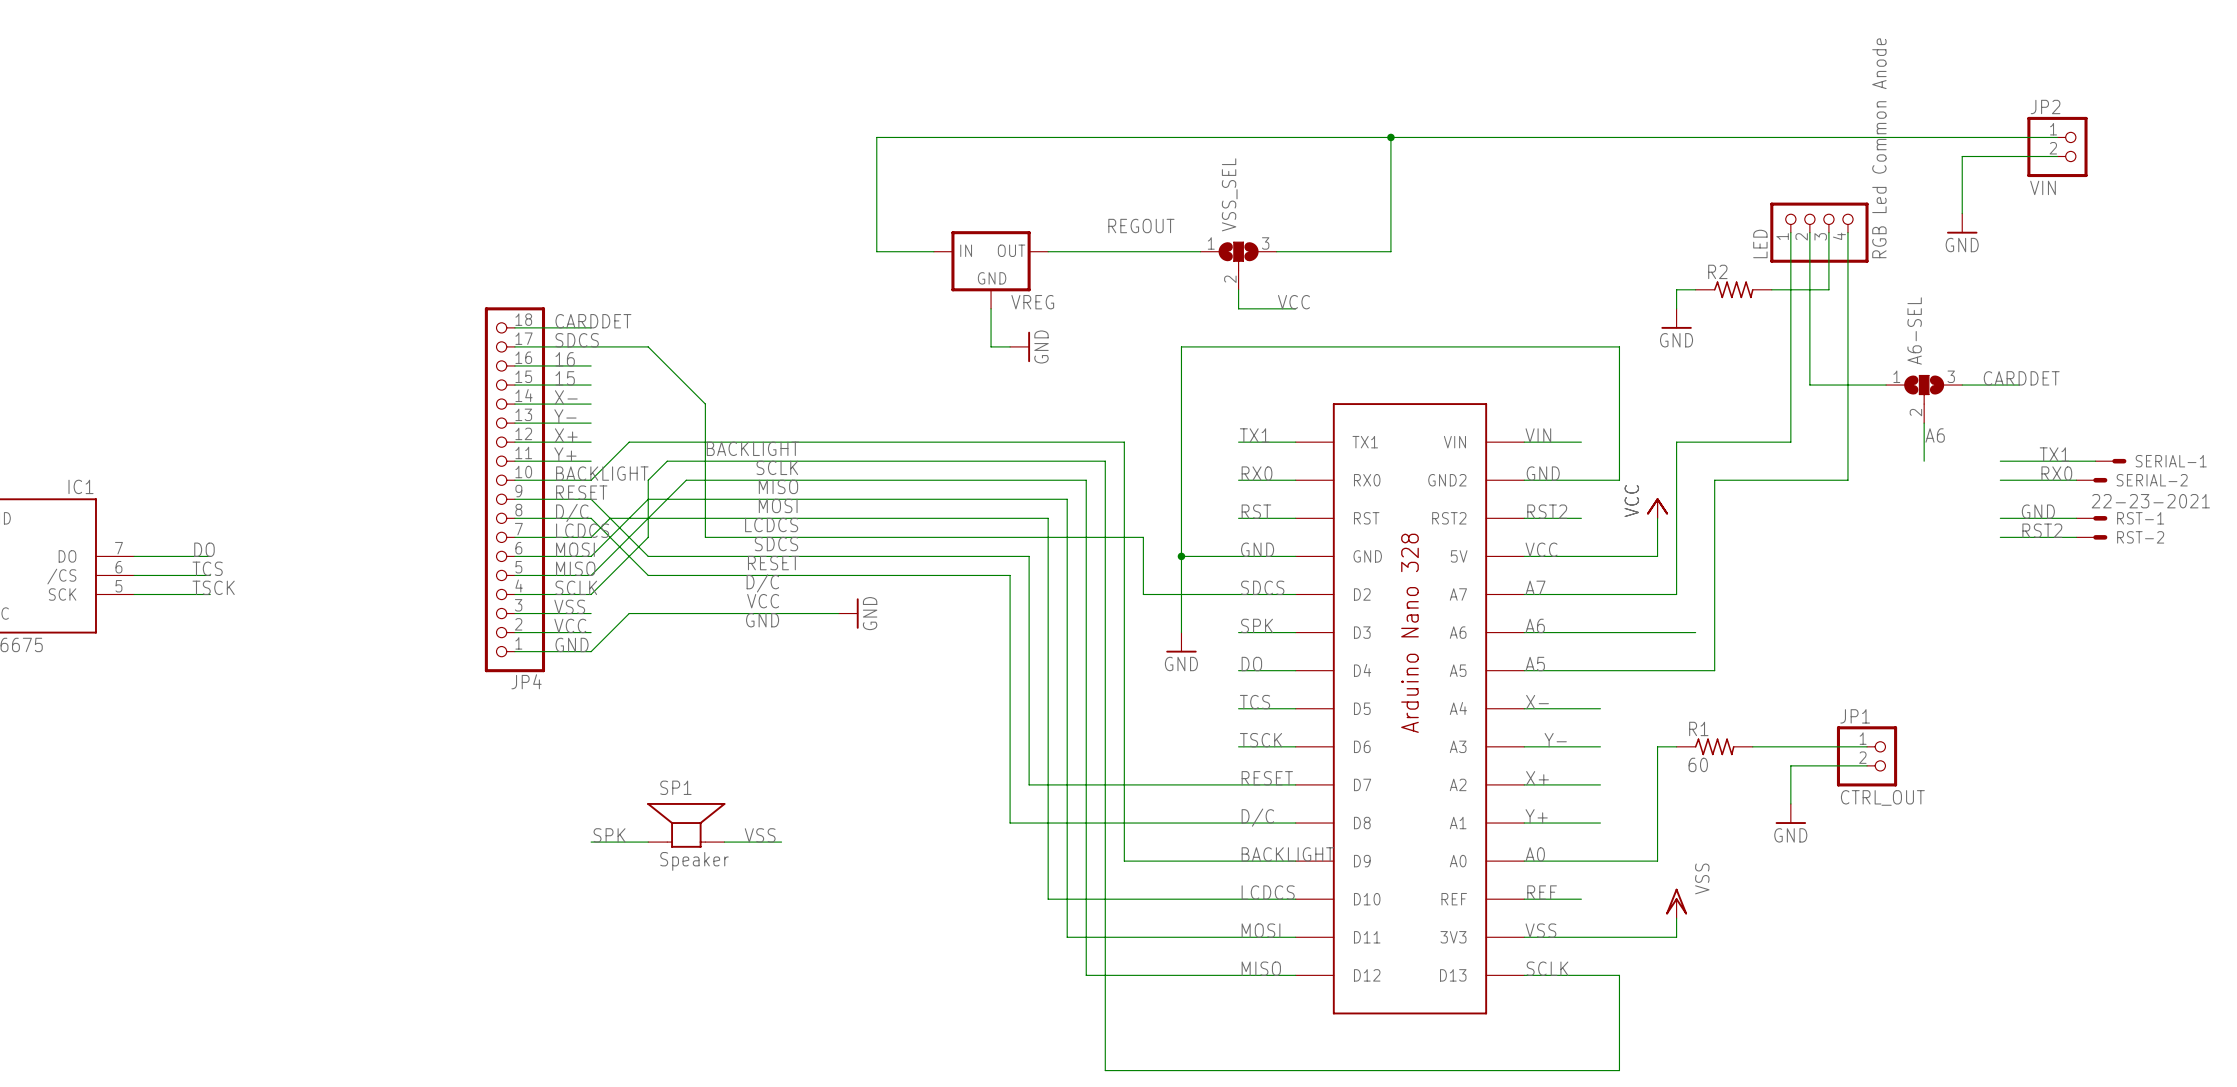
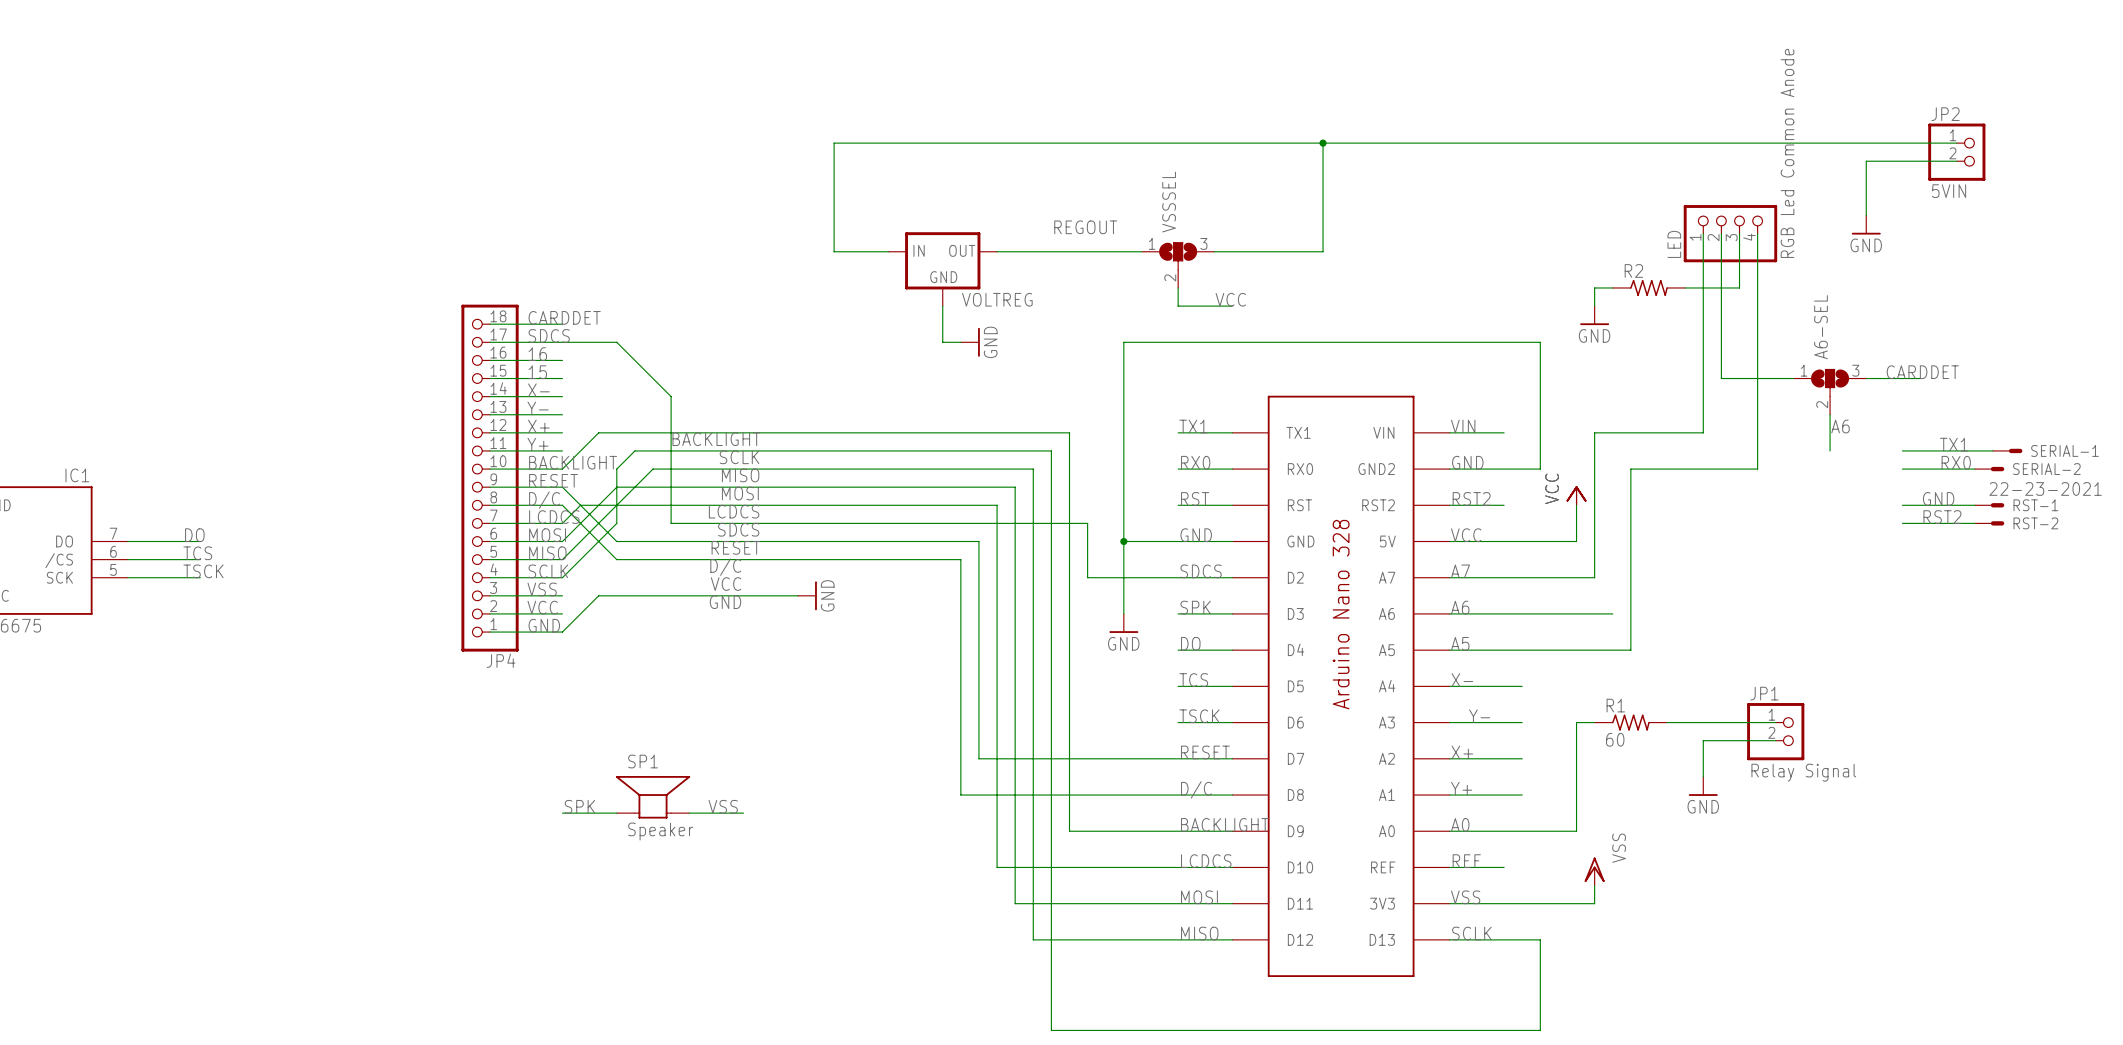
JP2 value: VIN (2043, 187) -> 5VIN (1949, 191)
VSS_SEL name: VSS_SEL (1229, 194) -> VSSSEL (1169, 202)
VREG name: VREG (1032, 302) -> VOLTREG (997, 299)
JP1 value: CTRL_OUT (1882, 797) -> Relay Signal (1803, 772)

